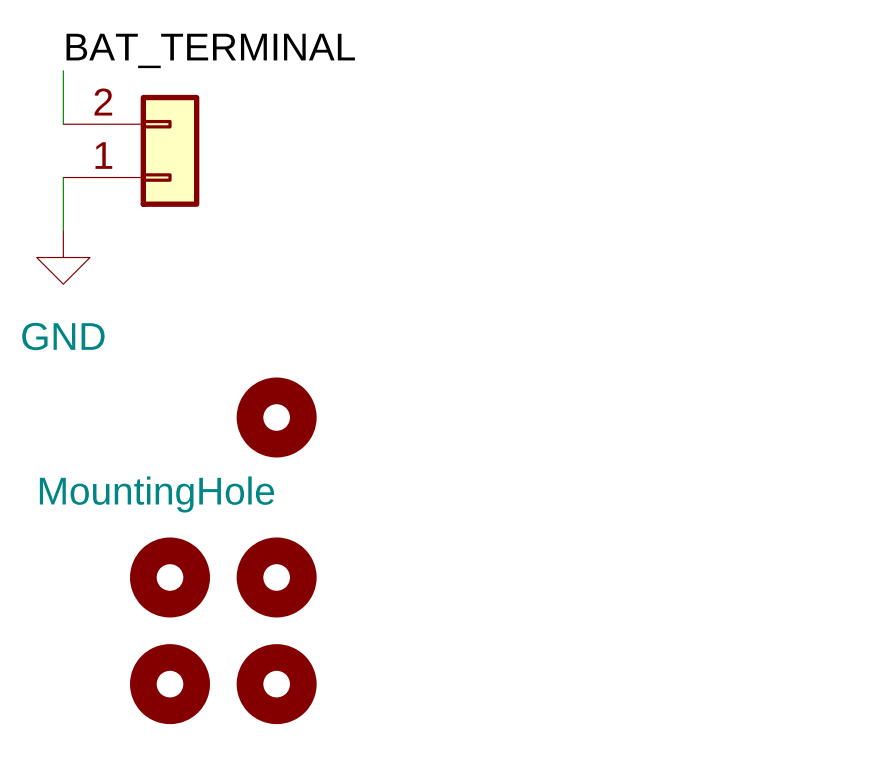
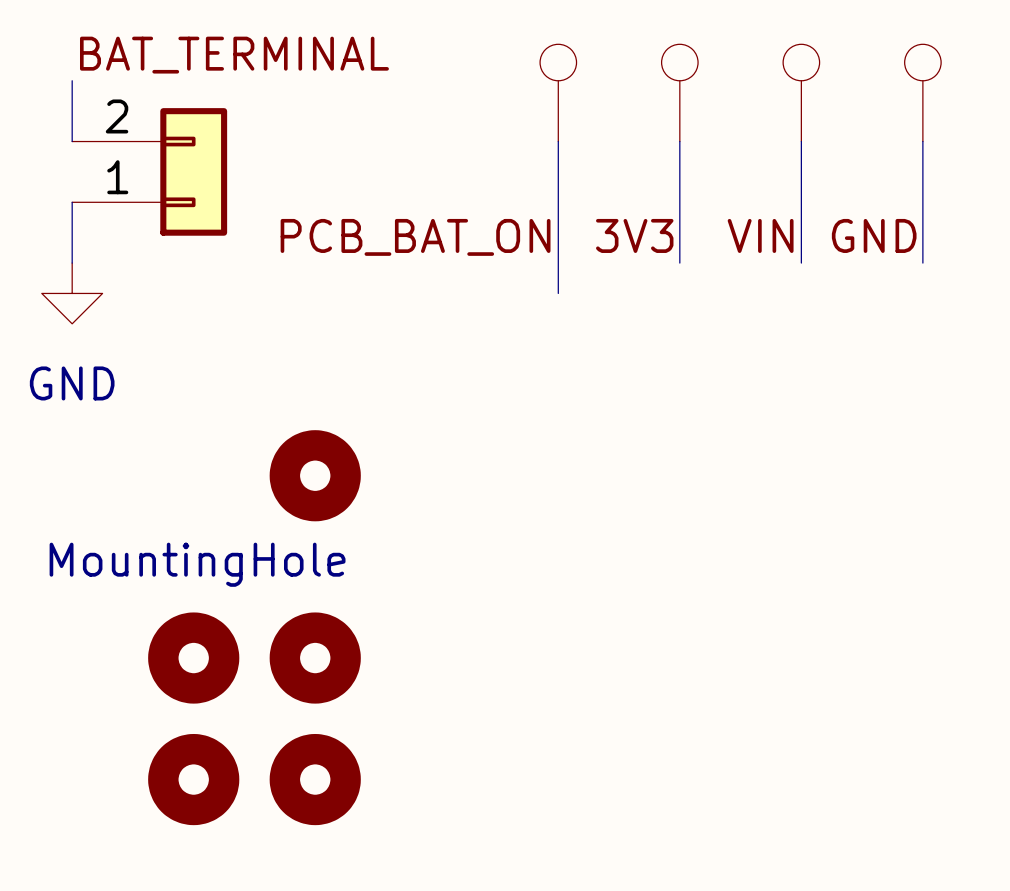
part: none -> (558, 92)
part: none -> (679, 92)
part: none -> (801, 92)
part: none -> (922, 92)
wire: none -> (558, 141) (558, 293)
wire: none -> (679, 141) (679, 263)
wire: none -> (801, 141) (801, 263)
wire: none -> (922, 141) (922, 263)
label: none -> 3V3 (634, 235)
label: none -> VIN (760, 235)
label: none -> GND (874, 235)
label: none -> PCB_BAT_ON (415, 237)

